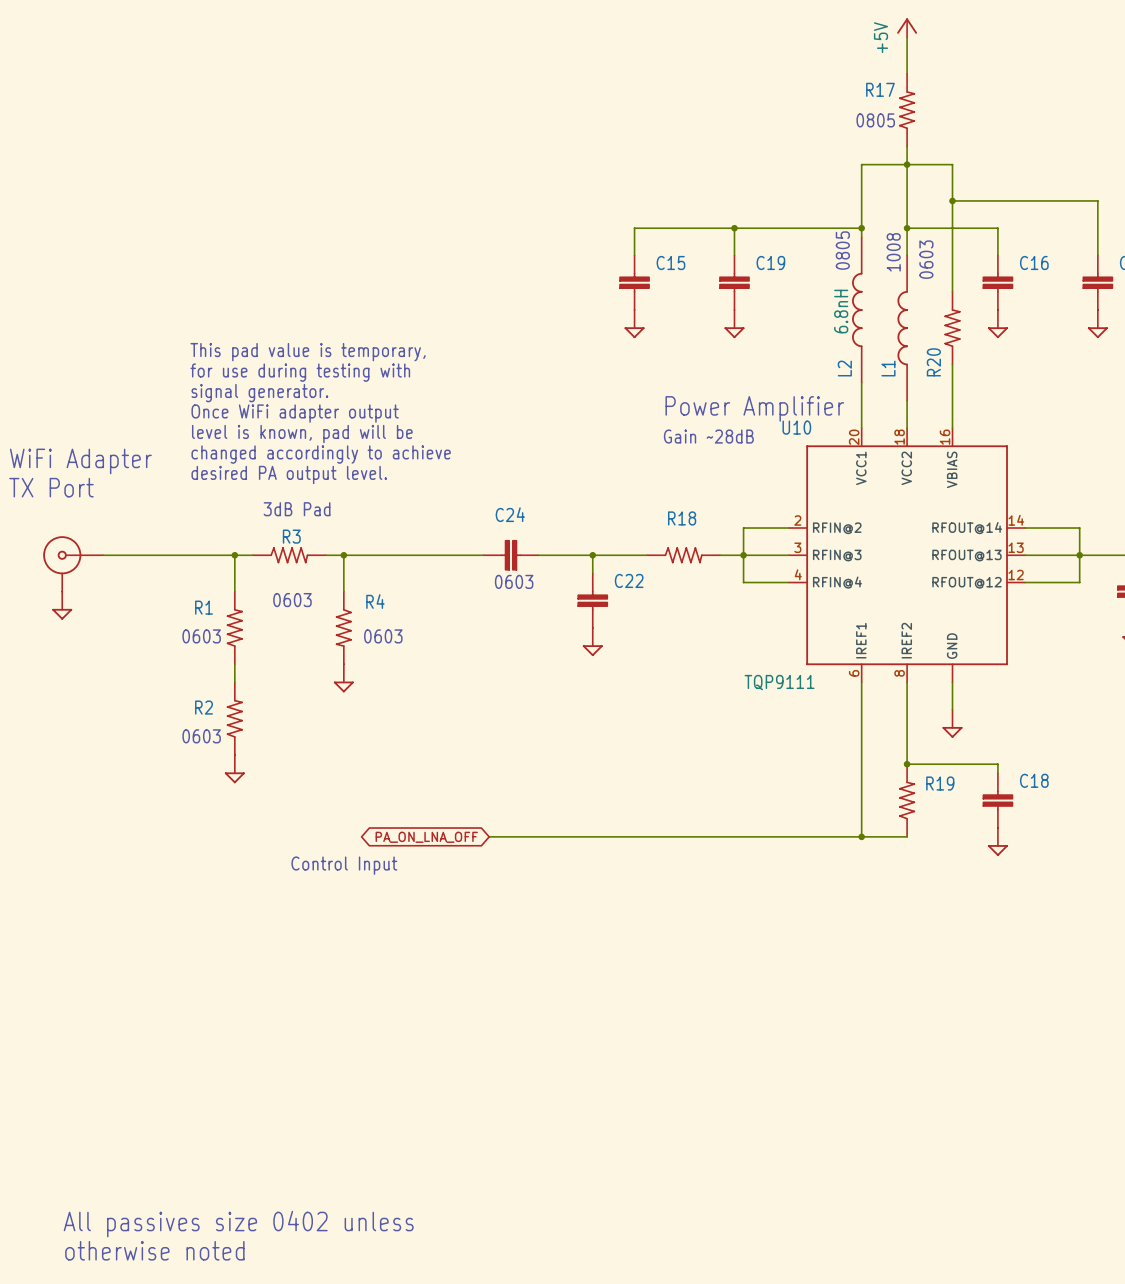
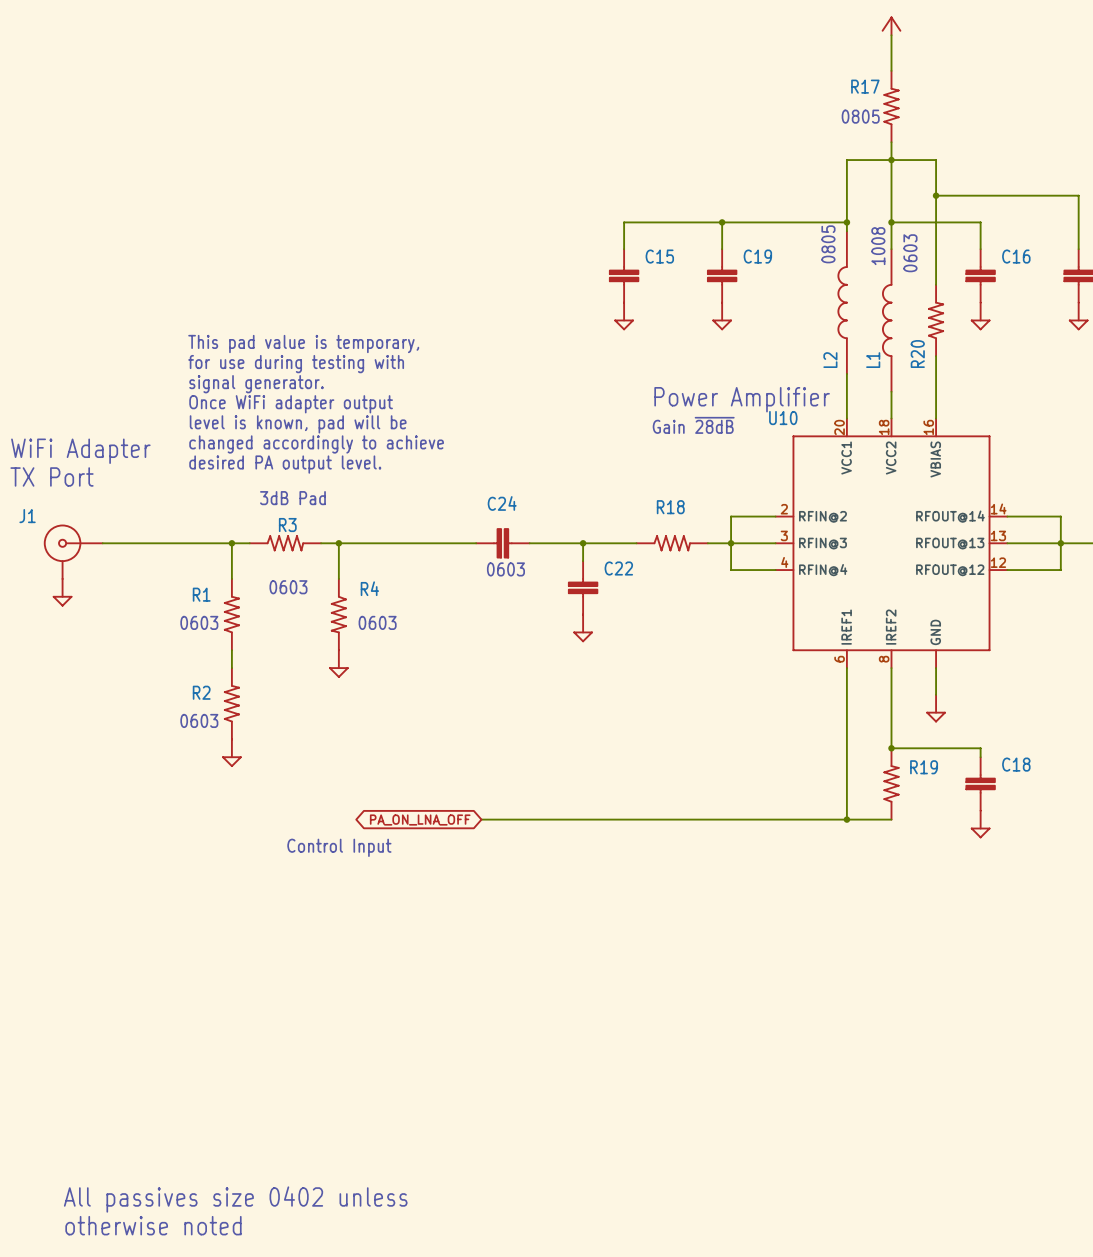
power symbol text: +5V (881, 37) -> none
L2 value: 6.8nH (841, 311) -> none
text: Gain ~28dB (708, 436) -> Gain ~{28dB} (693, 425)
J1 name: none -> J1 (27, 516)
U10 value: TQP9111 (779, 682) -> none

